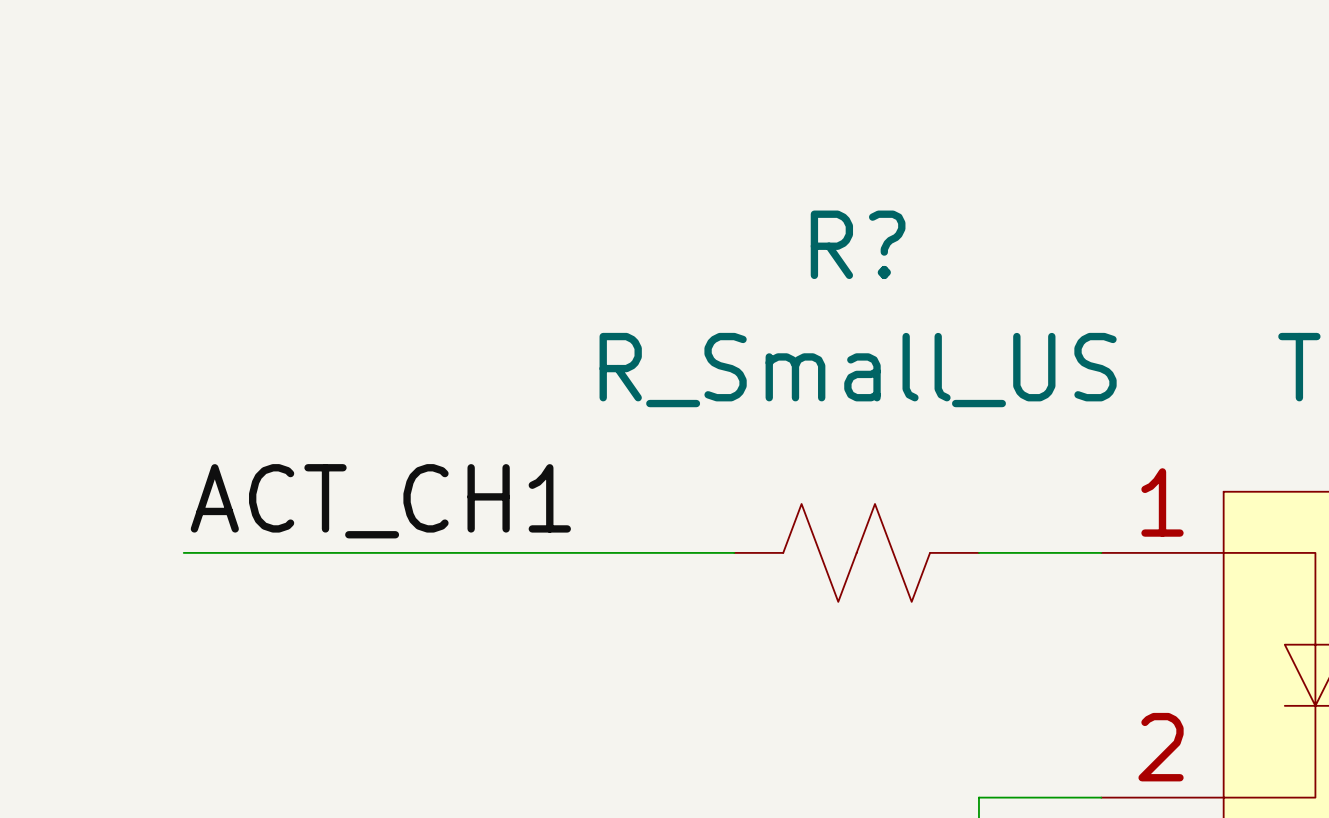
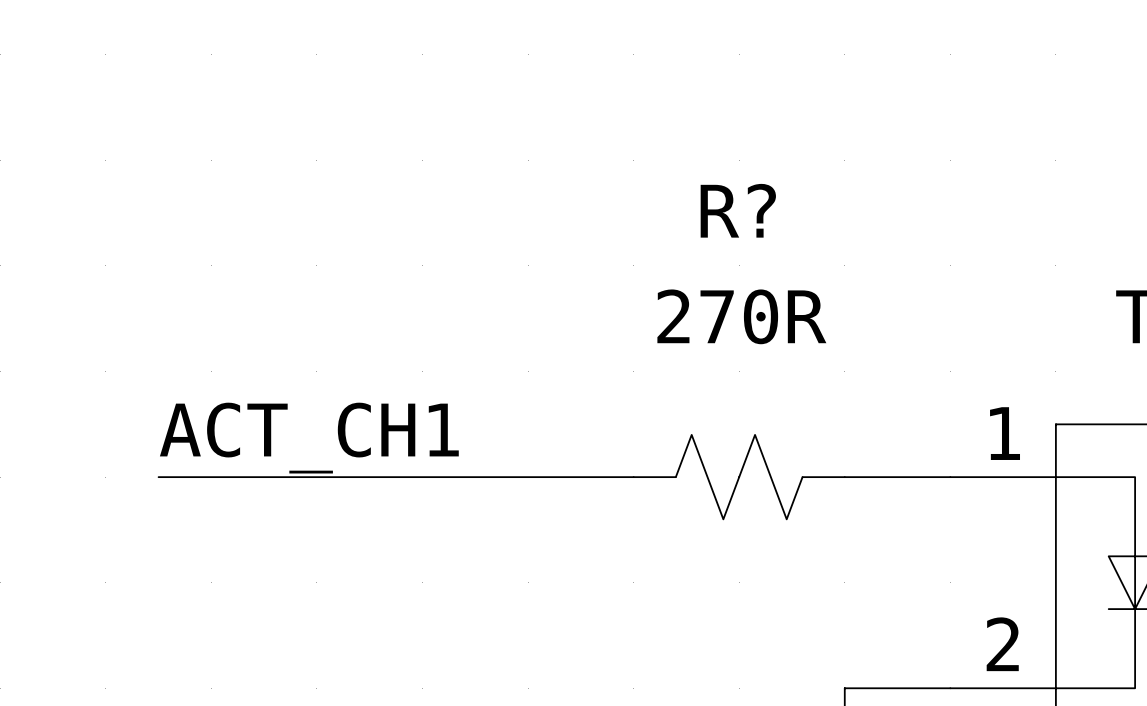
R? value: R_Small_US (858, 370) -> 270R (741, 316)

